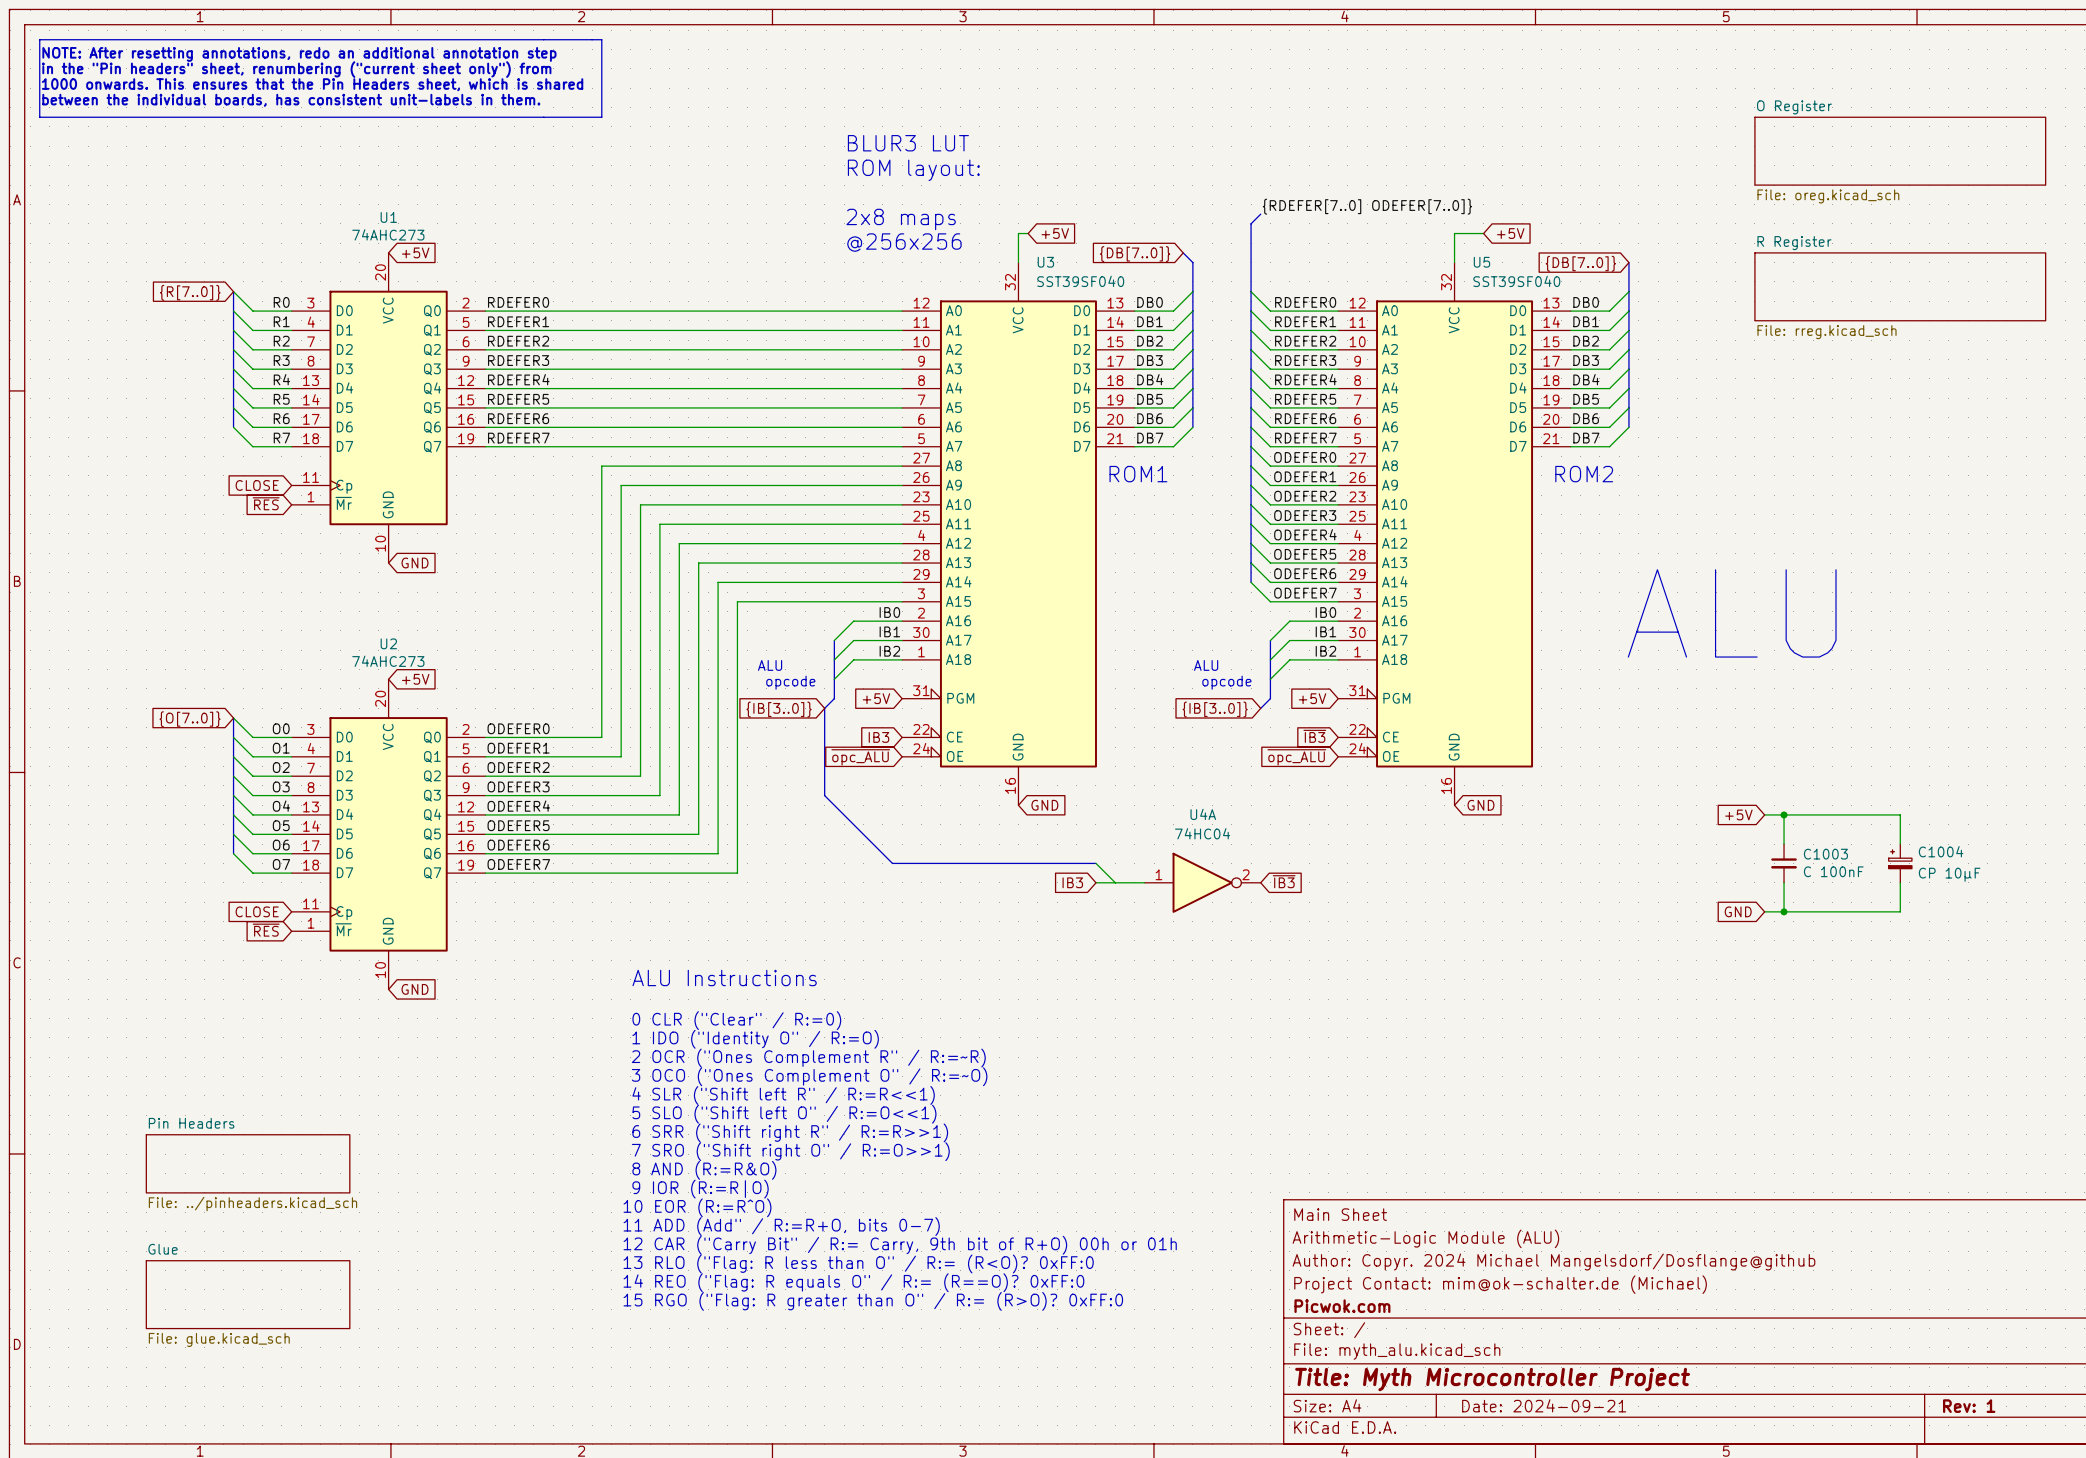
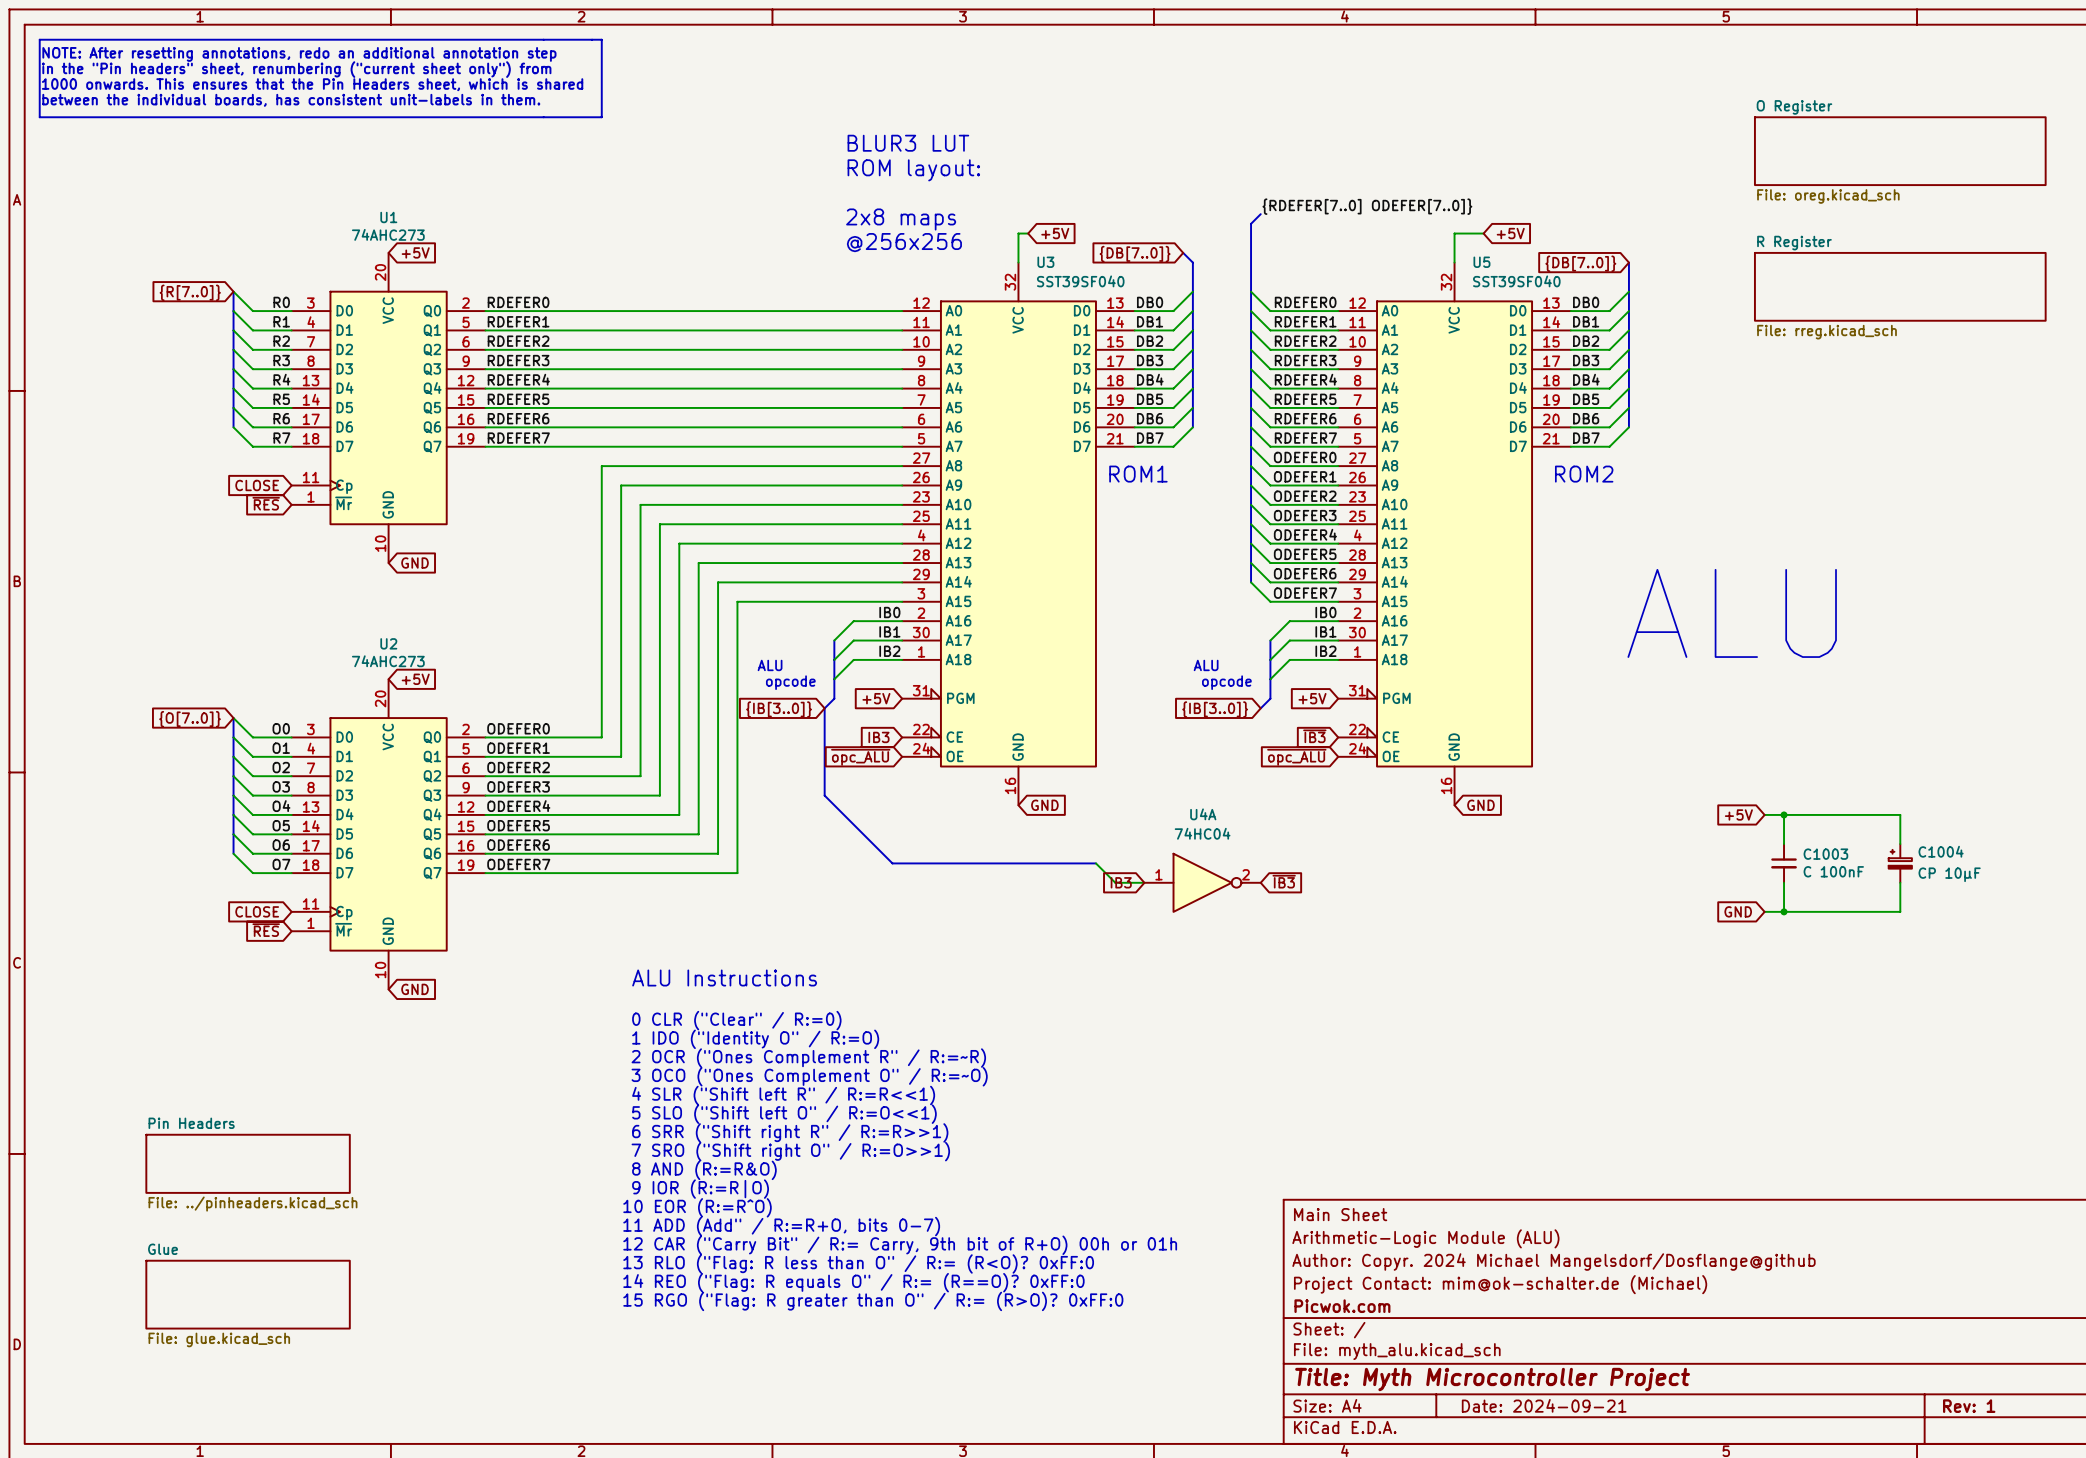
global label position: IB3 (1072, 882) -> IB3 (1121, 882)
wire: (1095, 882) (1115, 882) -> none

